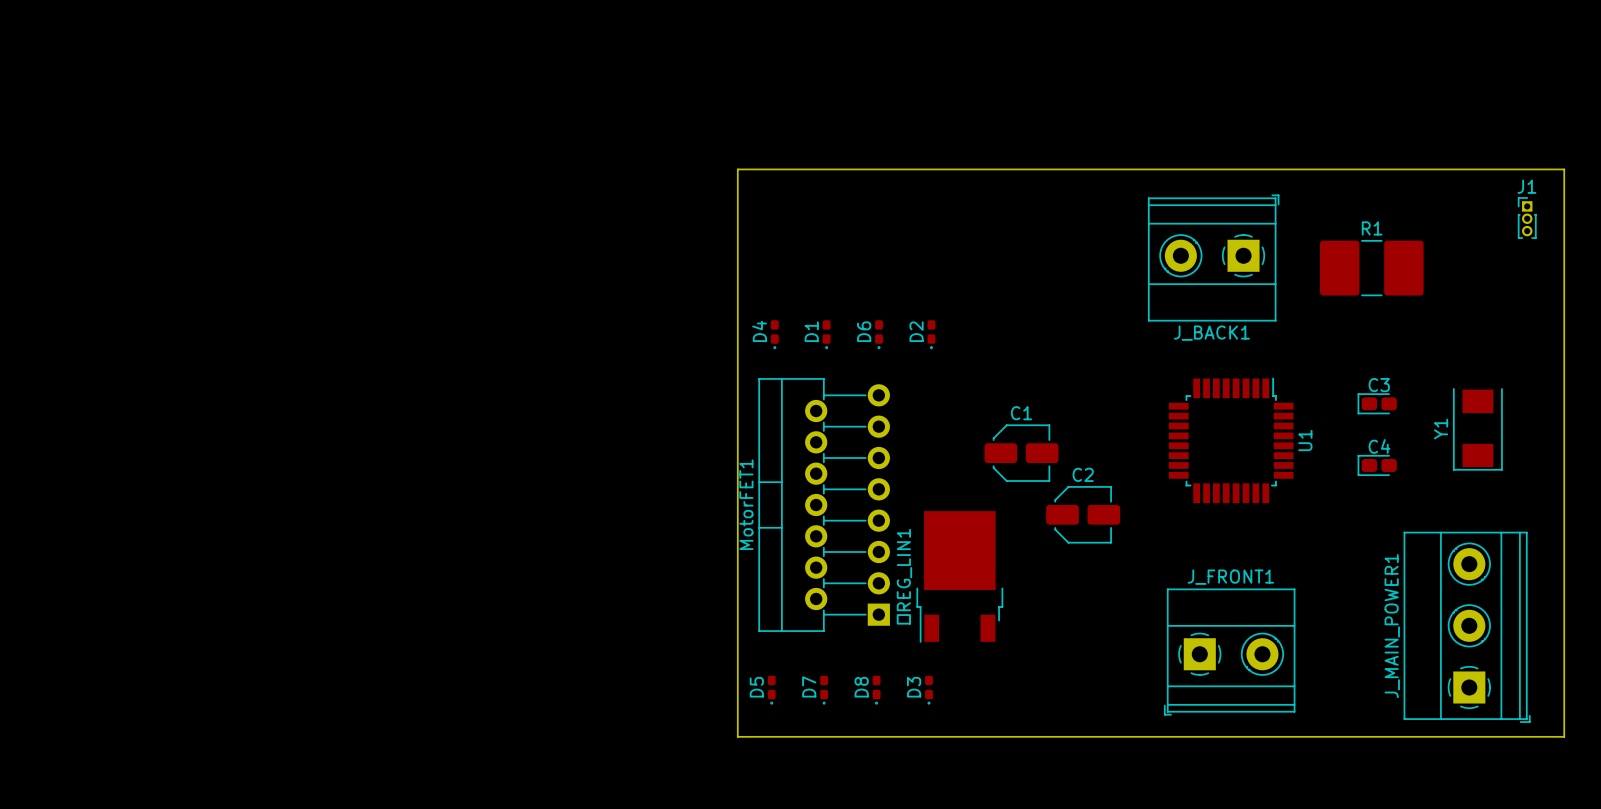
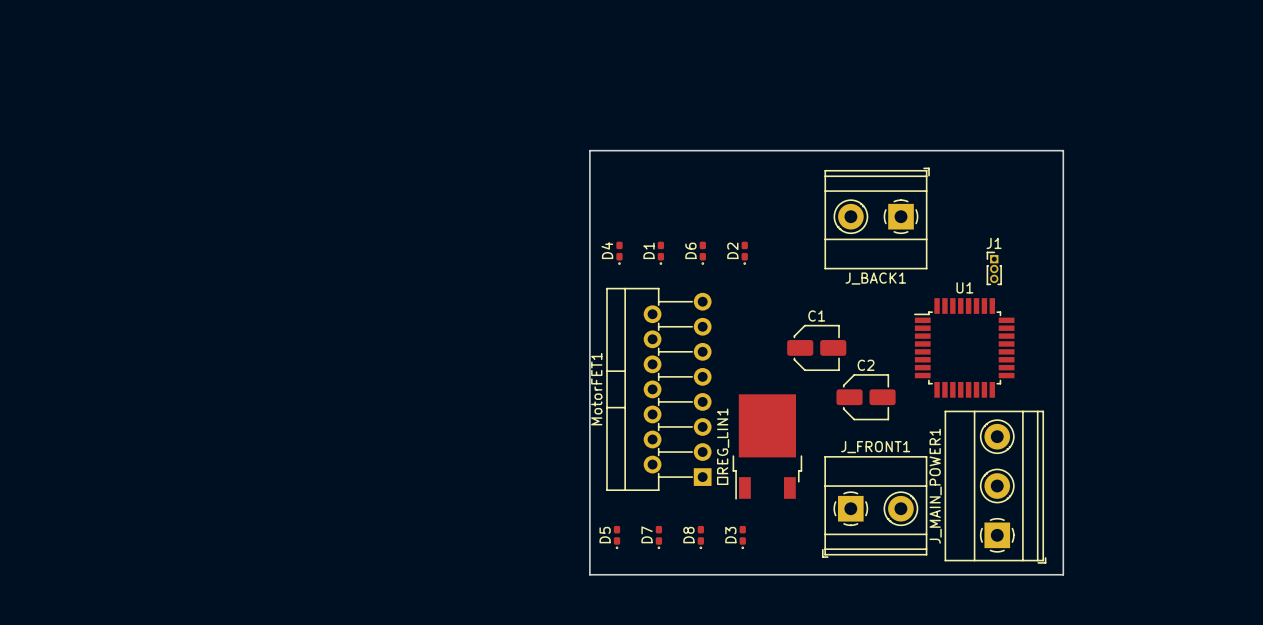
board edge: (737, 206) (737, 169) (1564, 169) (1564, 736) (1329, 736) -> (589, 150) (1063, 150) (1063, 574)
J1 position: (1527, 217) -> (994, 268)
J_BACK1 position: (1213, 258) -> (877, 218)
R1: (1371, 268) -> none
C3: (1377, 403) -> none
Y1: (1477, 429) -> none
U1 rotation: 0° (1231, 440) -> 90° counterclockwise (964, 347)
C4: (1377, 465) -> none
J_MAIN_POWER1 position: (1467, 627) -> (995, 487)
J_FRONT1 position: (1229, 652) -> (874, 506)

